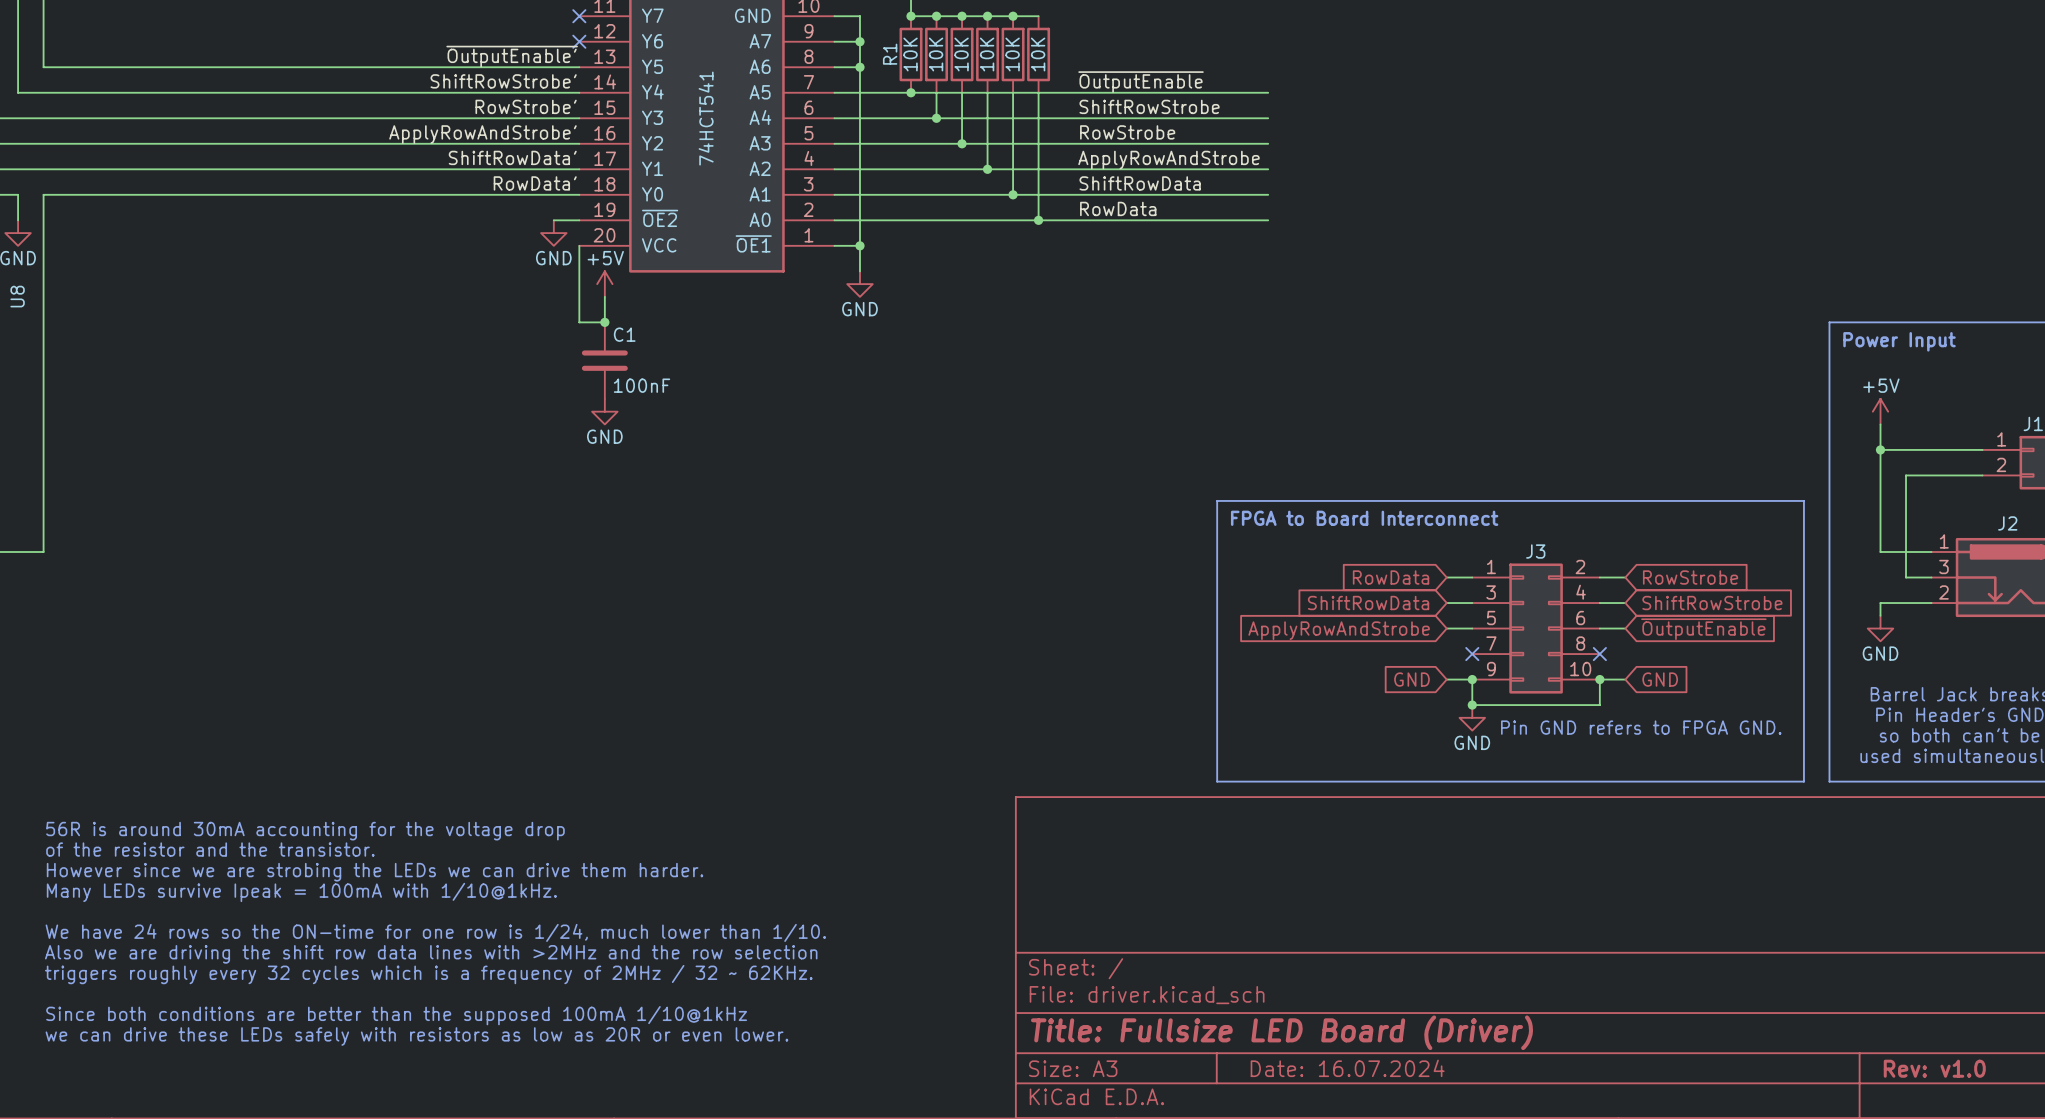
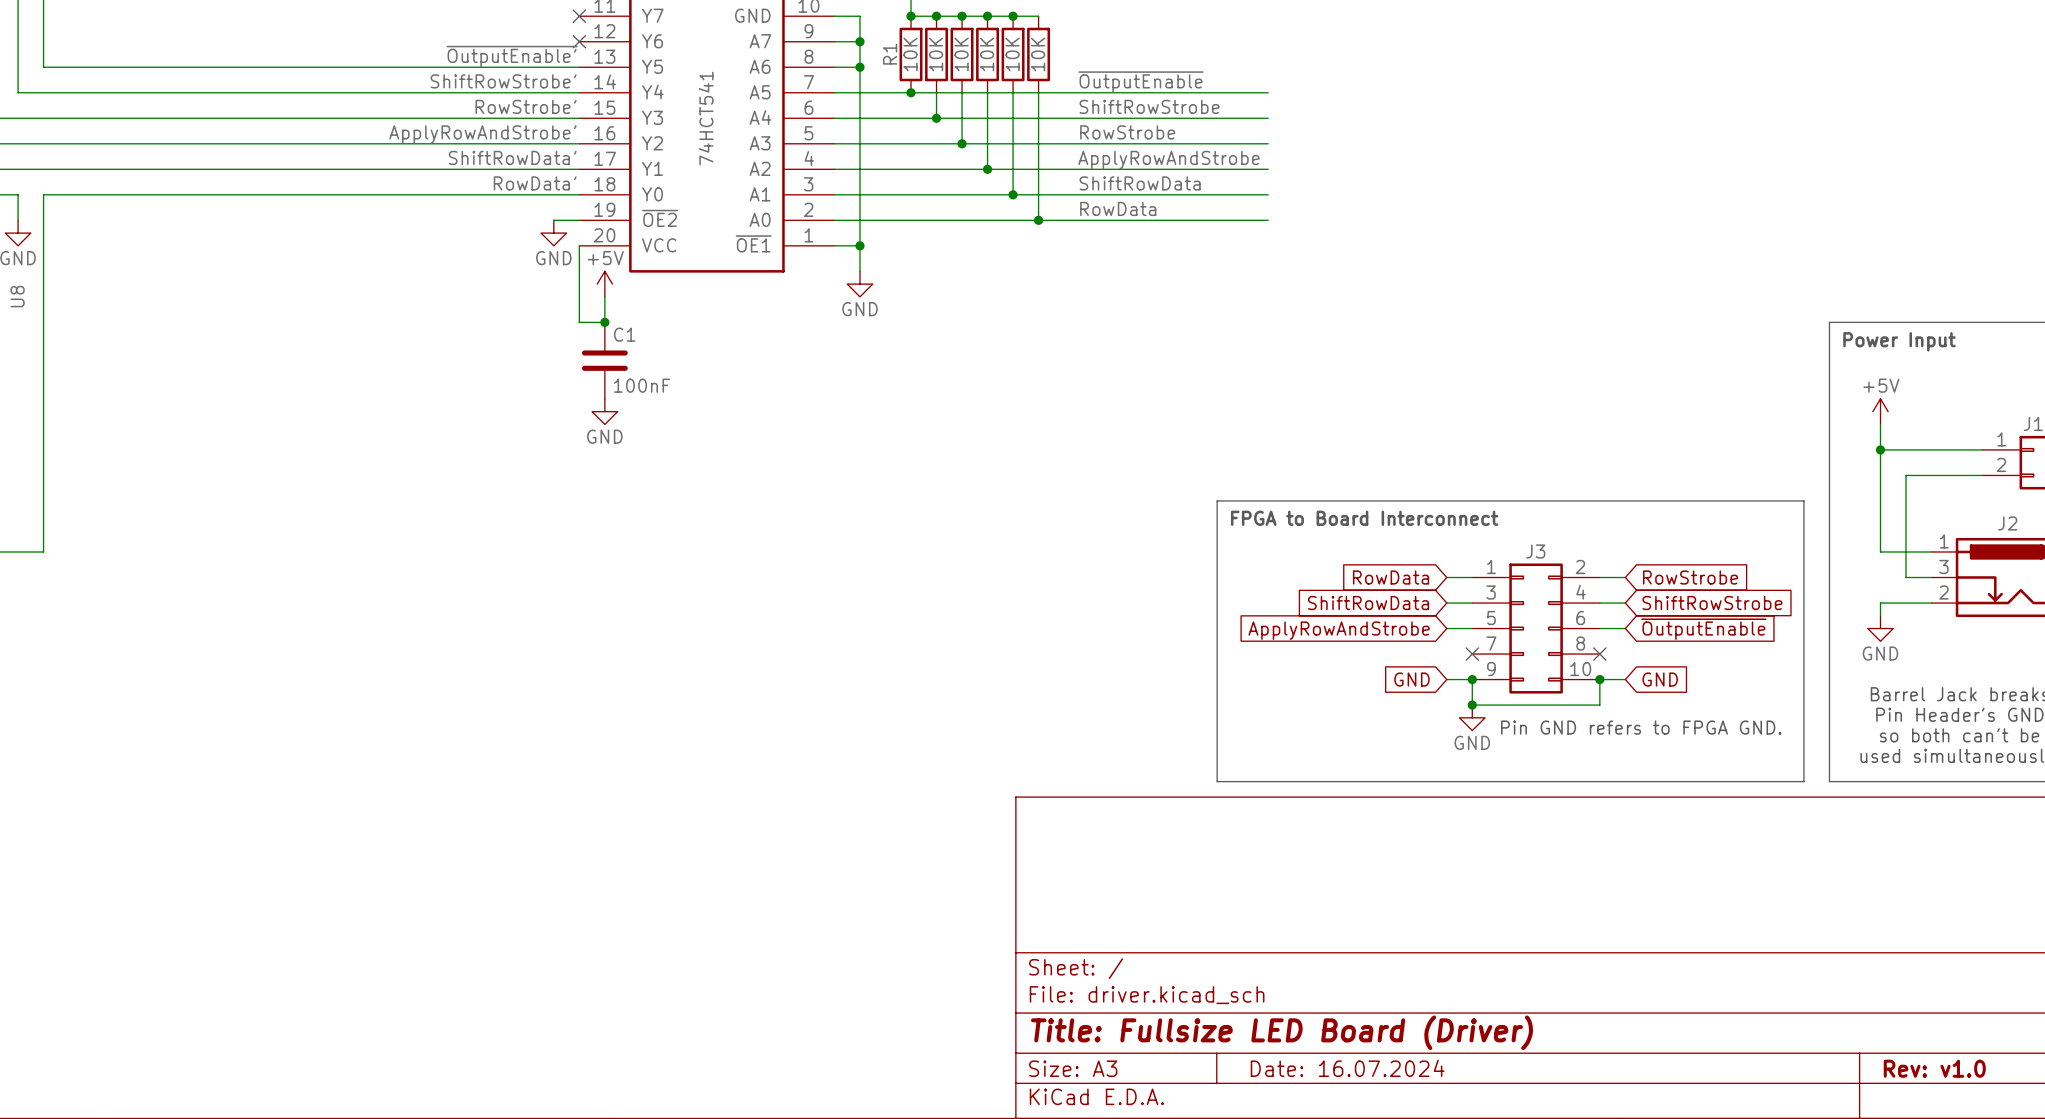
text: 56R is around 30mA accounting for the voltage drop (305, 831) -> none
text: of the resistor and the transistor. (210, 849) -> none
text: However since we are strobing the LEDs we can drive them harder. (375, 872) -> none
text: Many LEDs survive Ipeak = 100mA with 1/10@1kHz. (301, 892) -> none
text: We have 24 rows so the ON-time for one row is 1/24, much lower than 1/10. (435, 932) -> none
text: Also we are driving the shift row data lines with >2MHz and the row selection (431, 954) -> none
text: triggers roughly every 32 cycles which is a frequency of 2MHz / 32 ~ 62KHz. (428, 974) -> none
text: Since both conditions are better than the supposed 100mA 1/10@1kHz (396, 1015) -> none
text: we can drive these LEDs safely with resistors as low as 20R or even lower. (416, 1036) -> none

